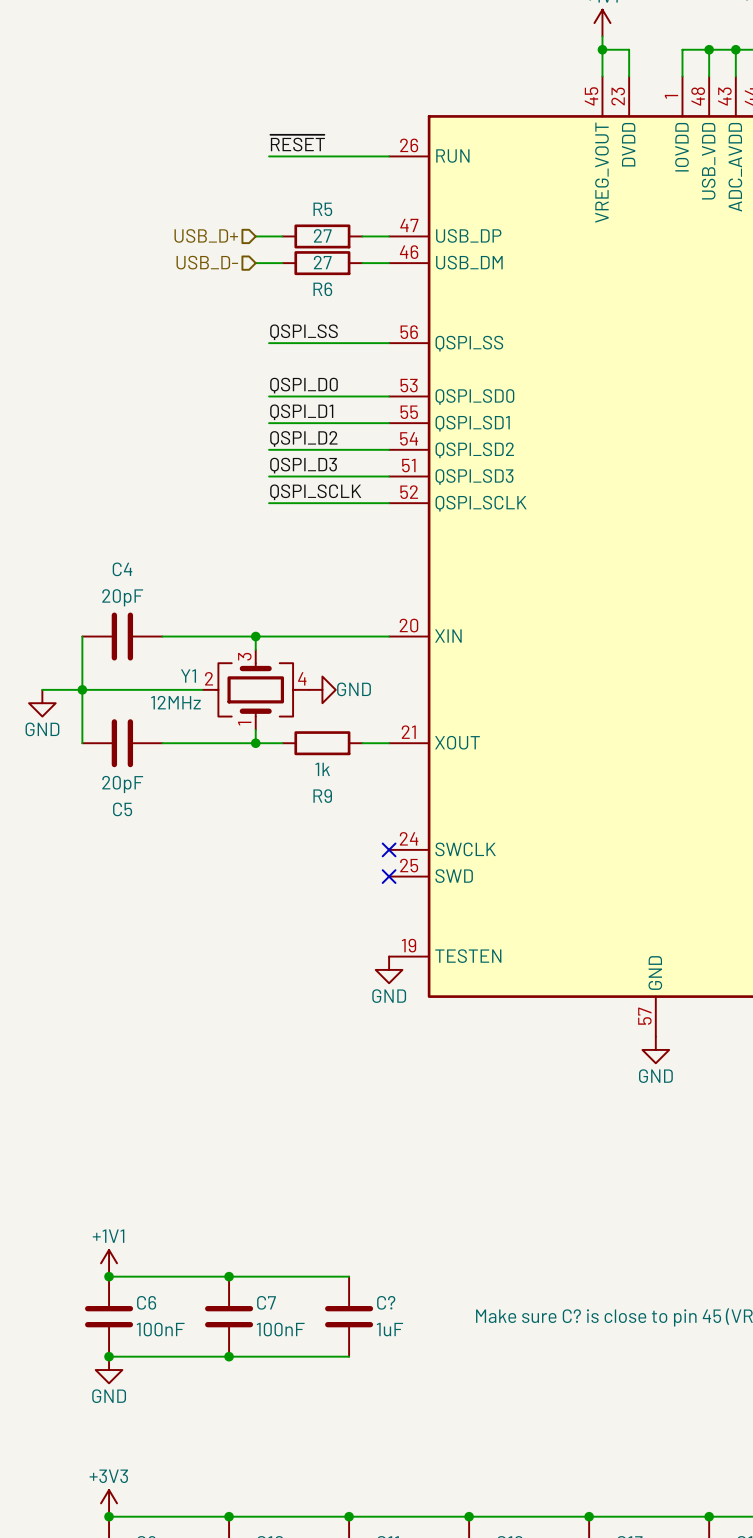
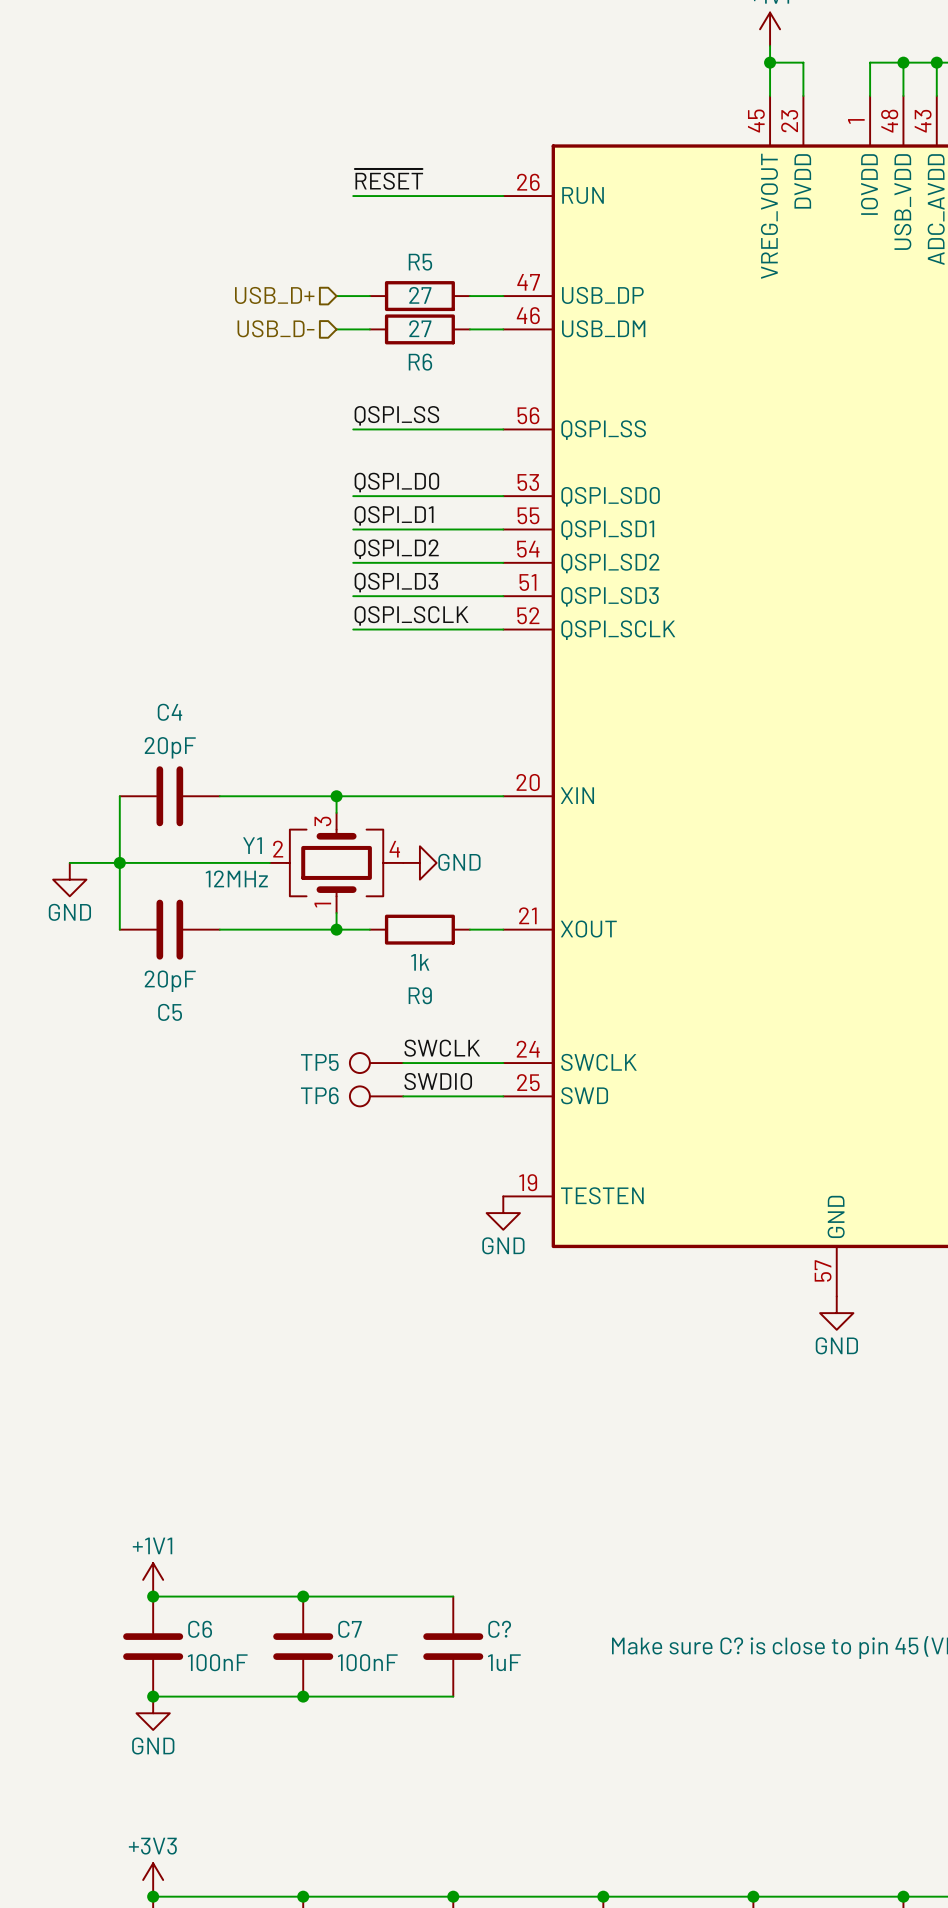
label: none -> SWCLK (442, 1048)
TP5: none -> (376, 1063)
wire: none -> (403, 1063) (503, 1063)
no-connect mark: (389, 849) -> none
label: none -> SWDIO (438, 1081)
TP6: none -> (376, 1096)
wire: none -> (403, 1096) (503, 1096)
no-connect mark: (389, 876) -> none

